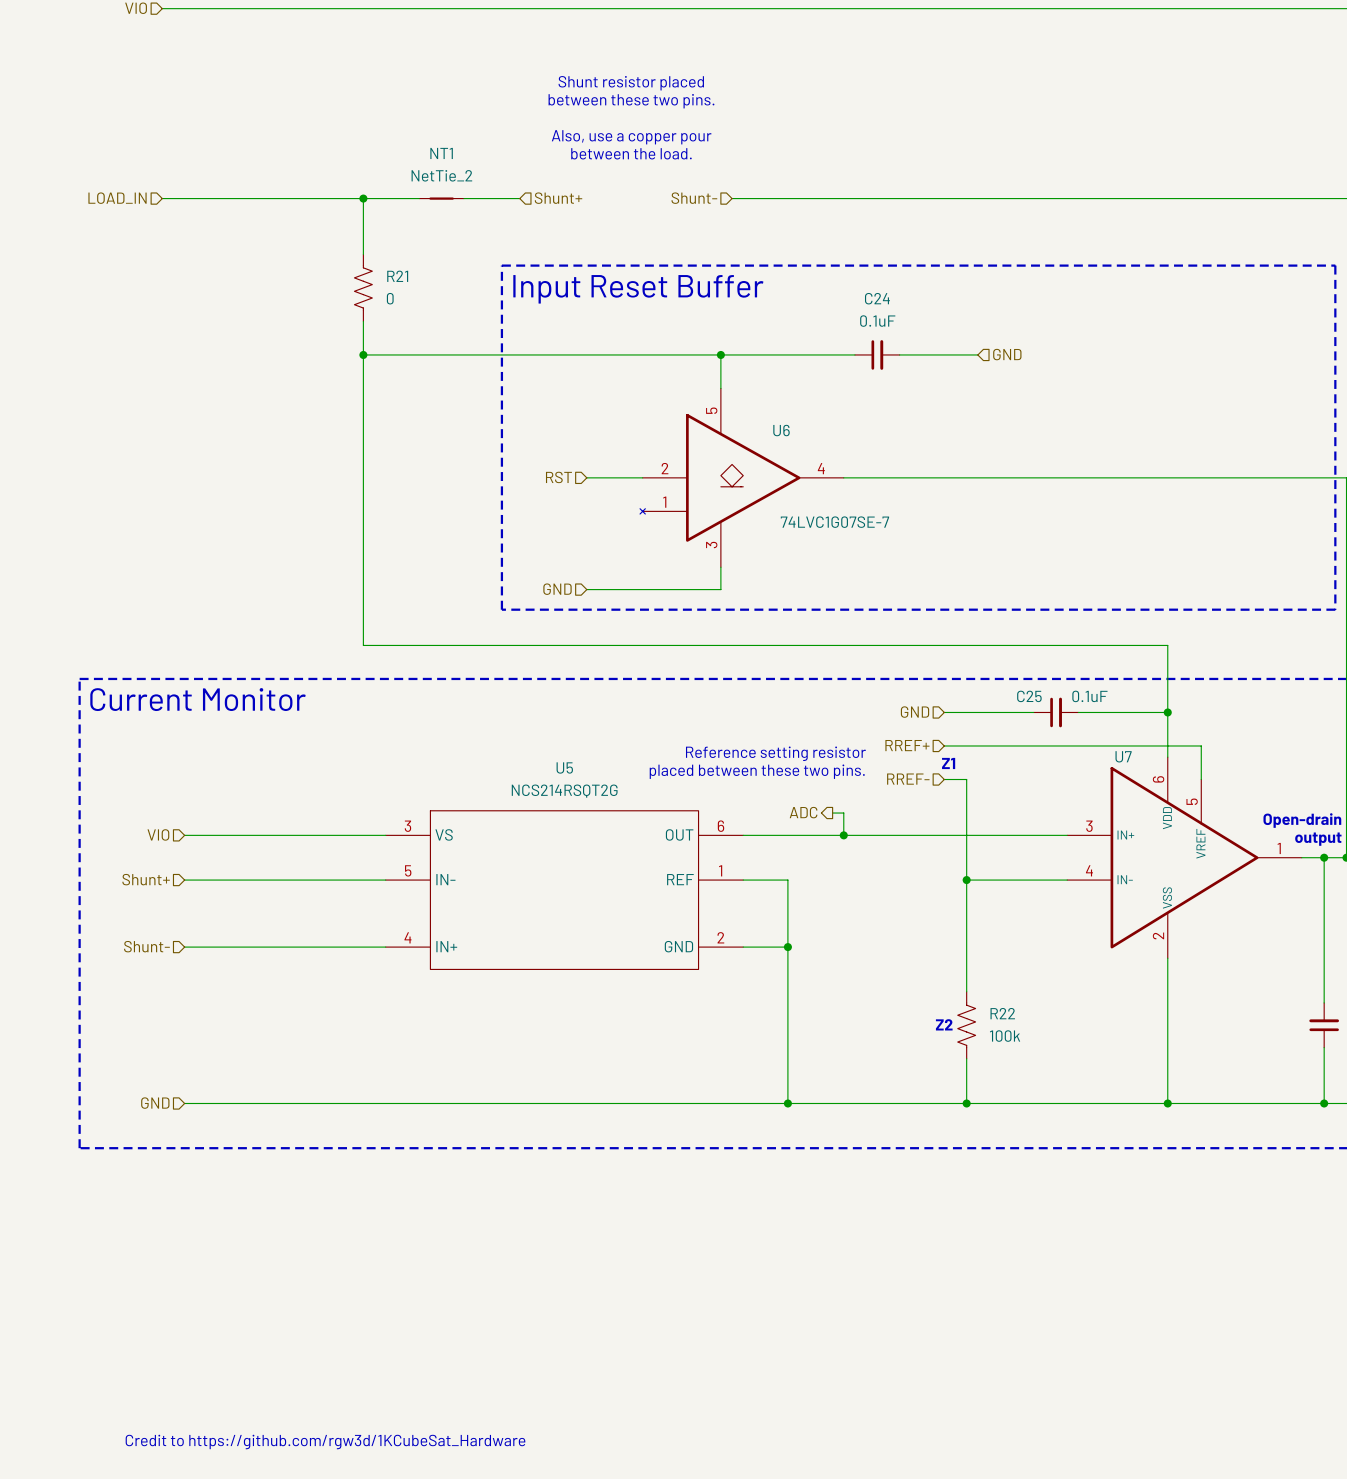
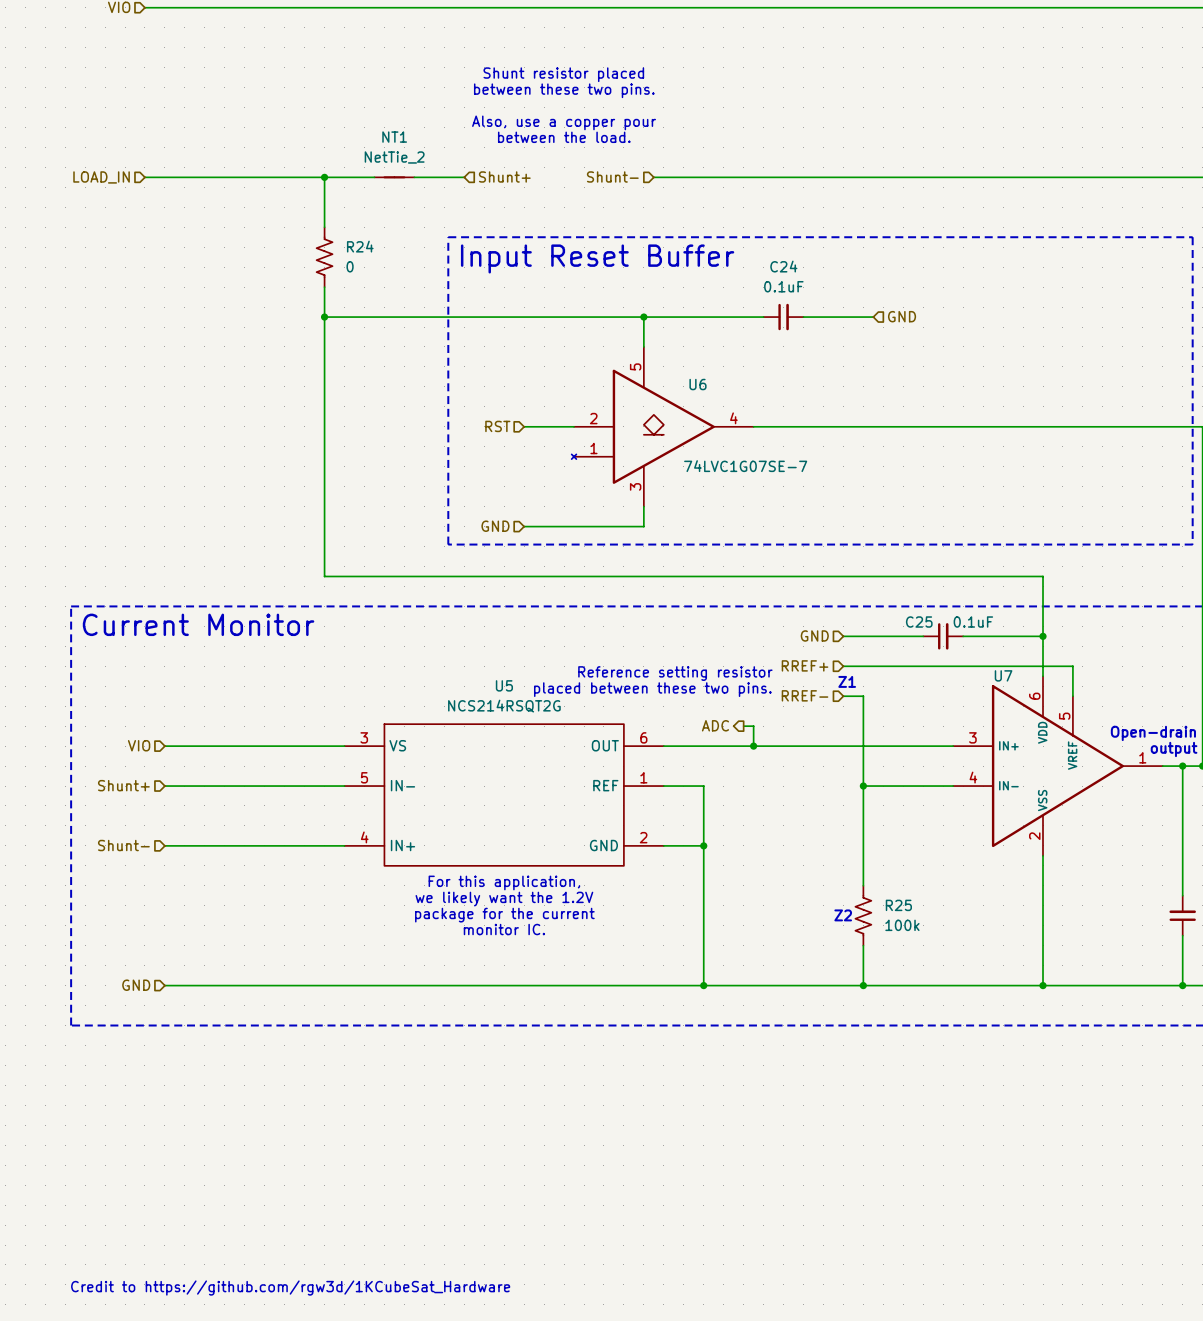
R21 name: R21 (397, 276) -> R24 (360, 246)
text: none -> For this application, (504, 882)
text: none -> we likely want the 1.2V (504, 899)
R22 name: R22 (1002, 1013) -> R25 (898, 905)
text: none -> package for the current (504, 915)
text: none -> monitor IC. (504, 929)

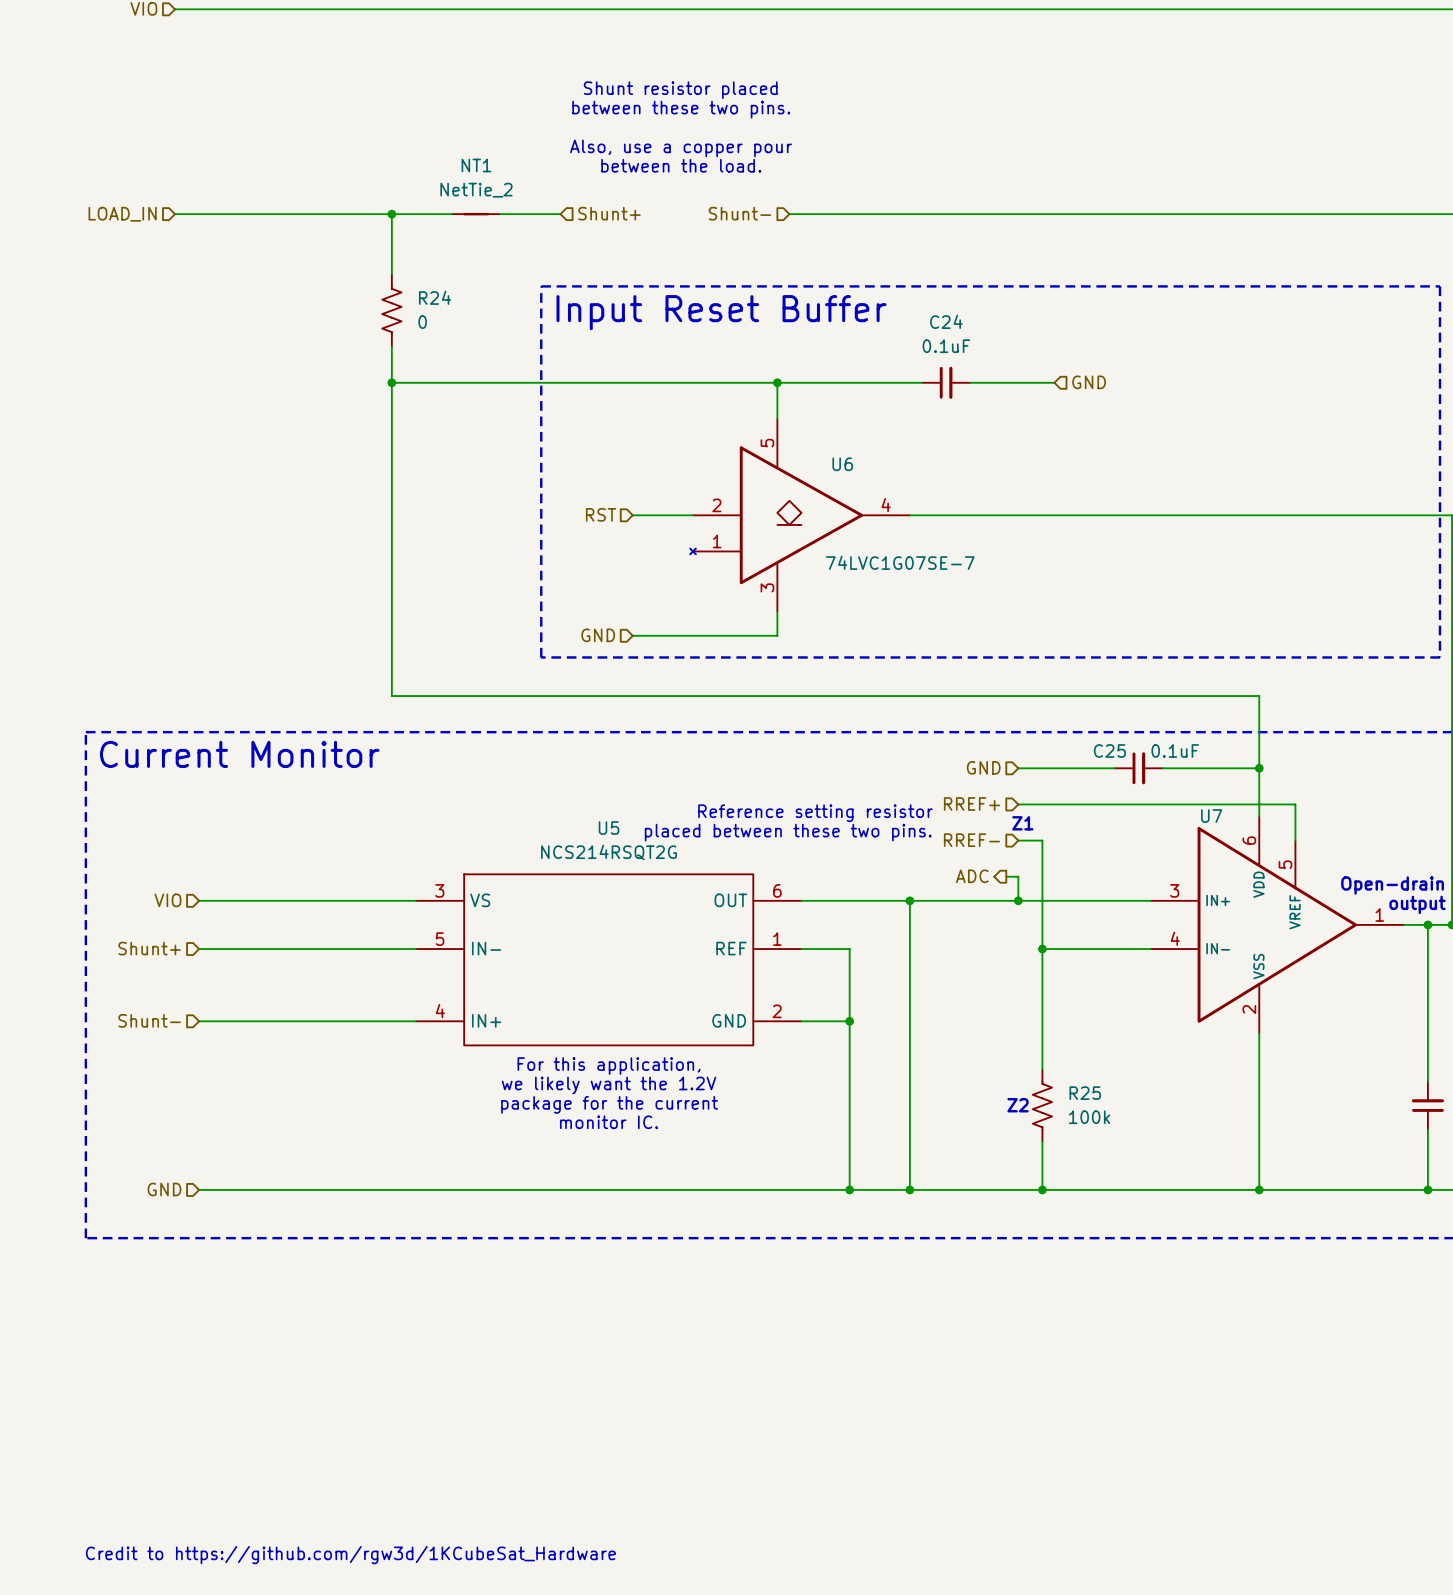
hierarchical label position: ADC (715, 725) -> ADC (972, 876)
wire: (743, 726) (753, 726) (753, 746) -> (909, 1189) (909, 900)
wire: none -> (1006, 876) (1018, 876) (1018, 900)
junction: none -> (1018, 900)
junction: none -> (909, 1189)

